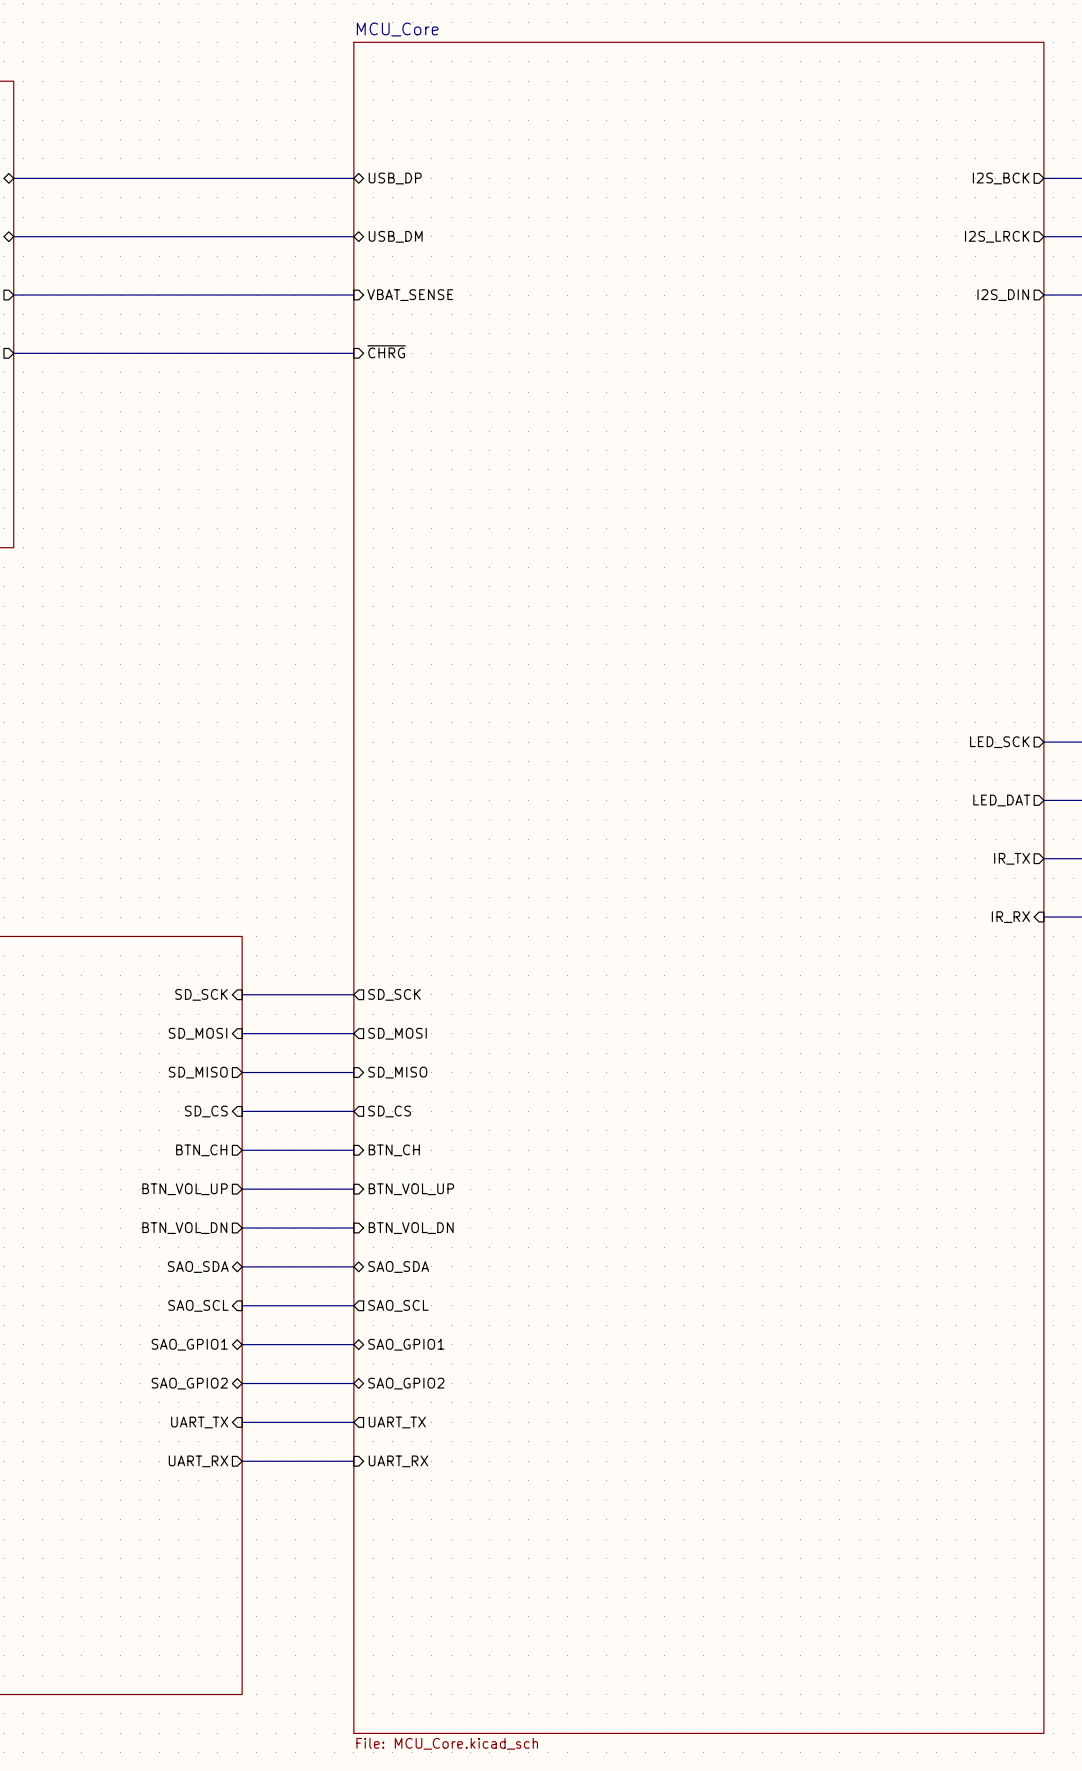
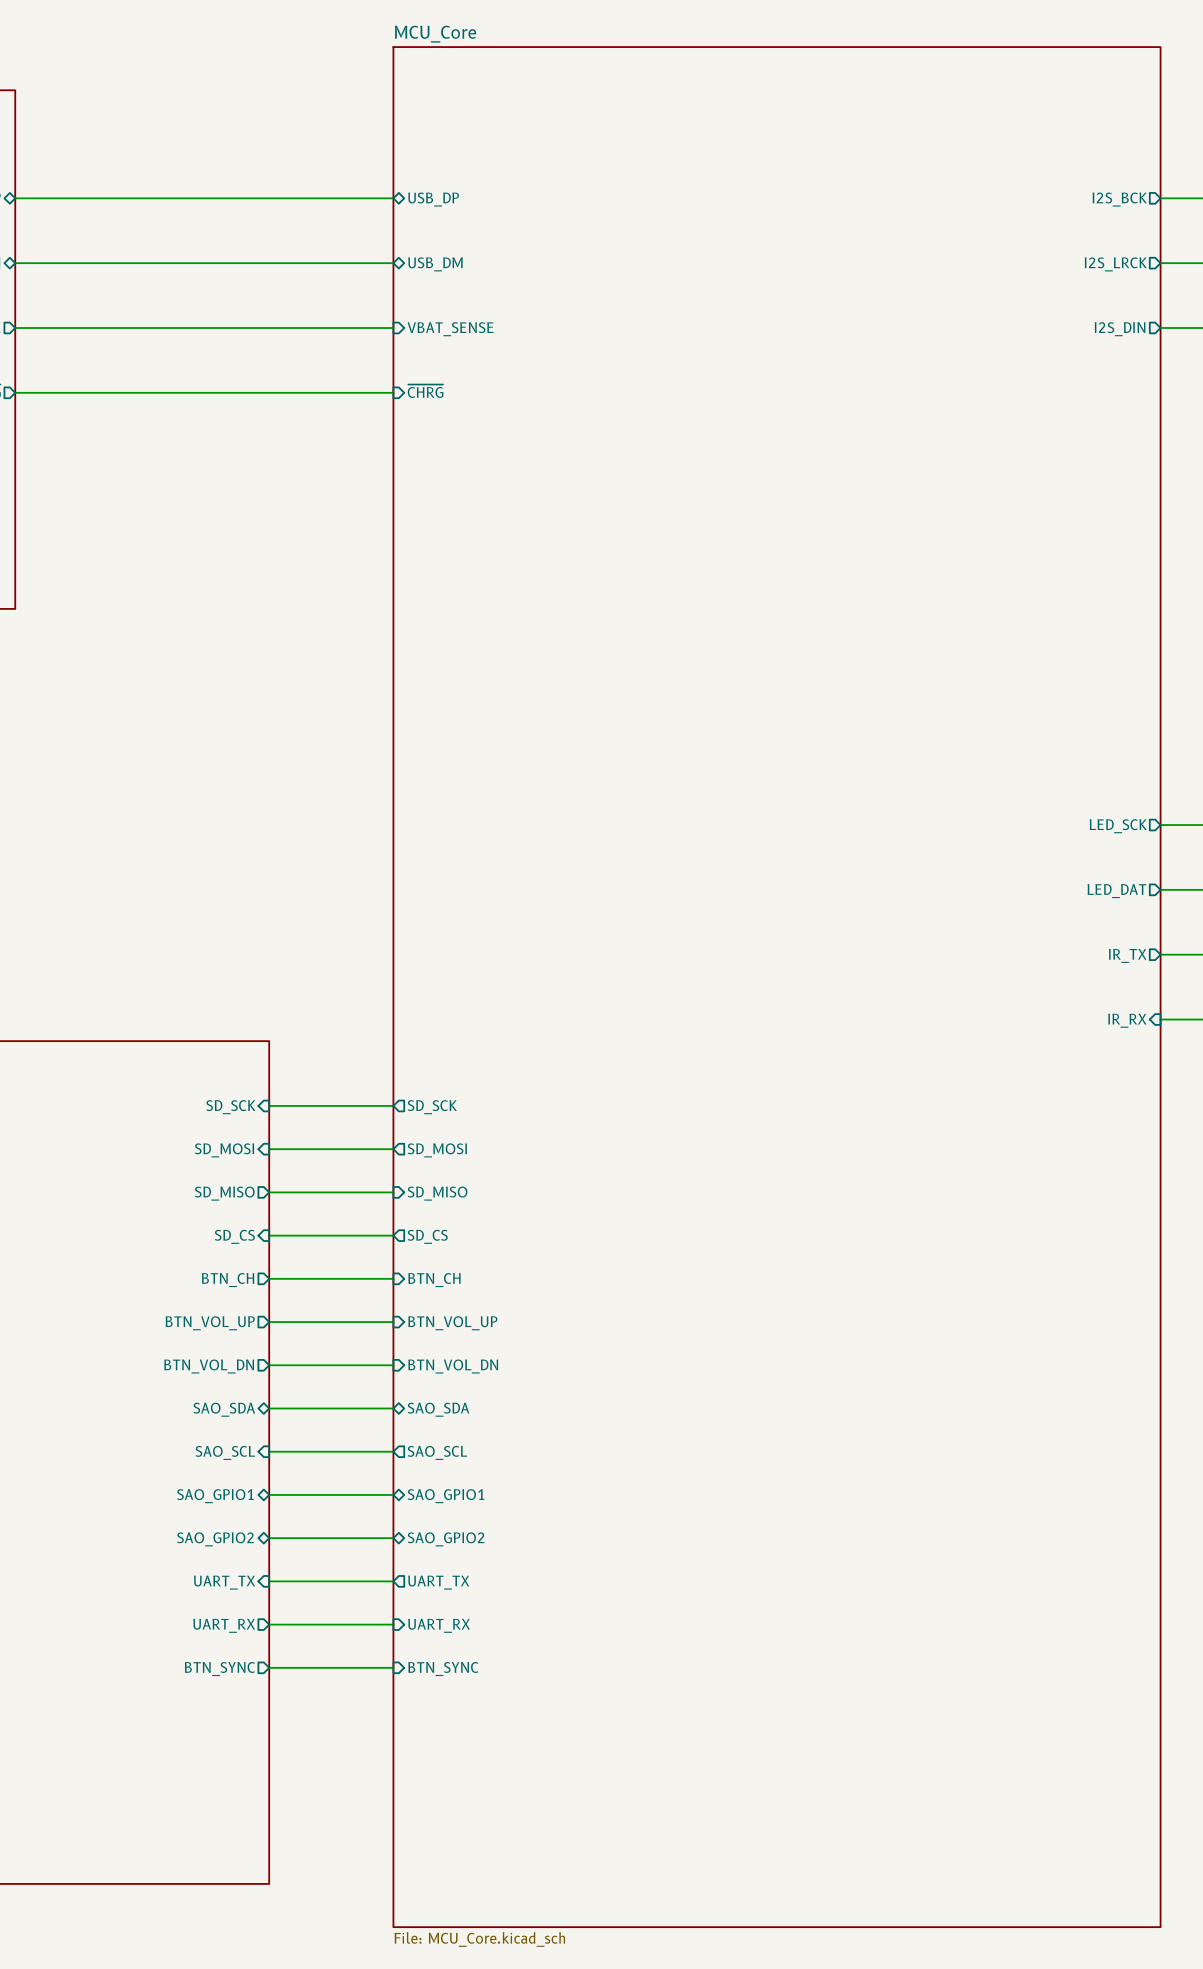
sheet pin: none -> BTN_SYNC (219, 1669)
wire: none -> (269, 1667) (393, 1667)
sheet pin: none -> BTN_SYNC (443, 1669)

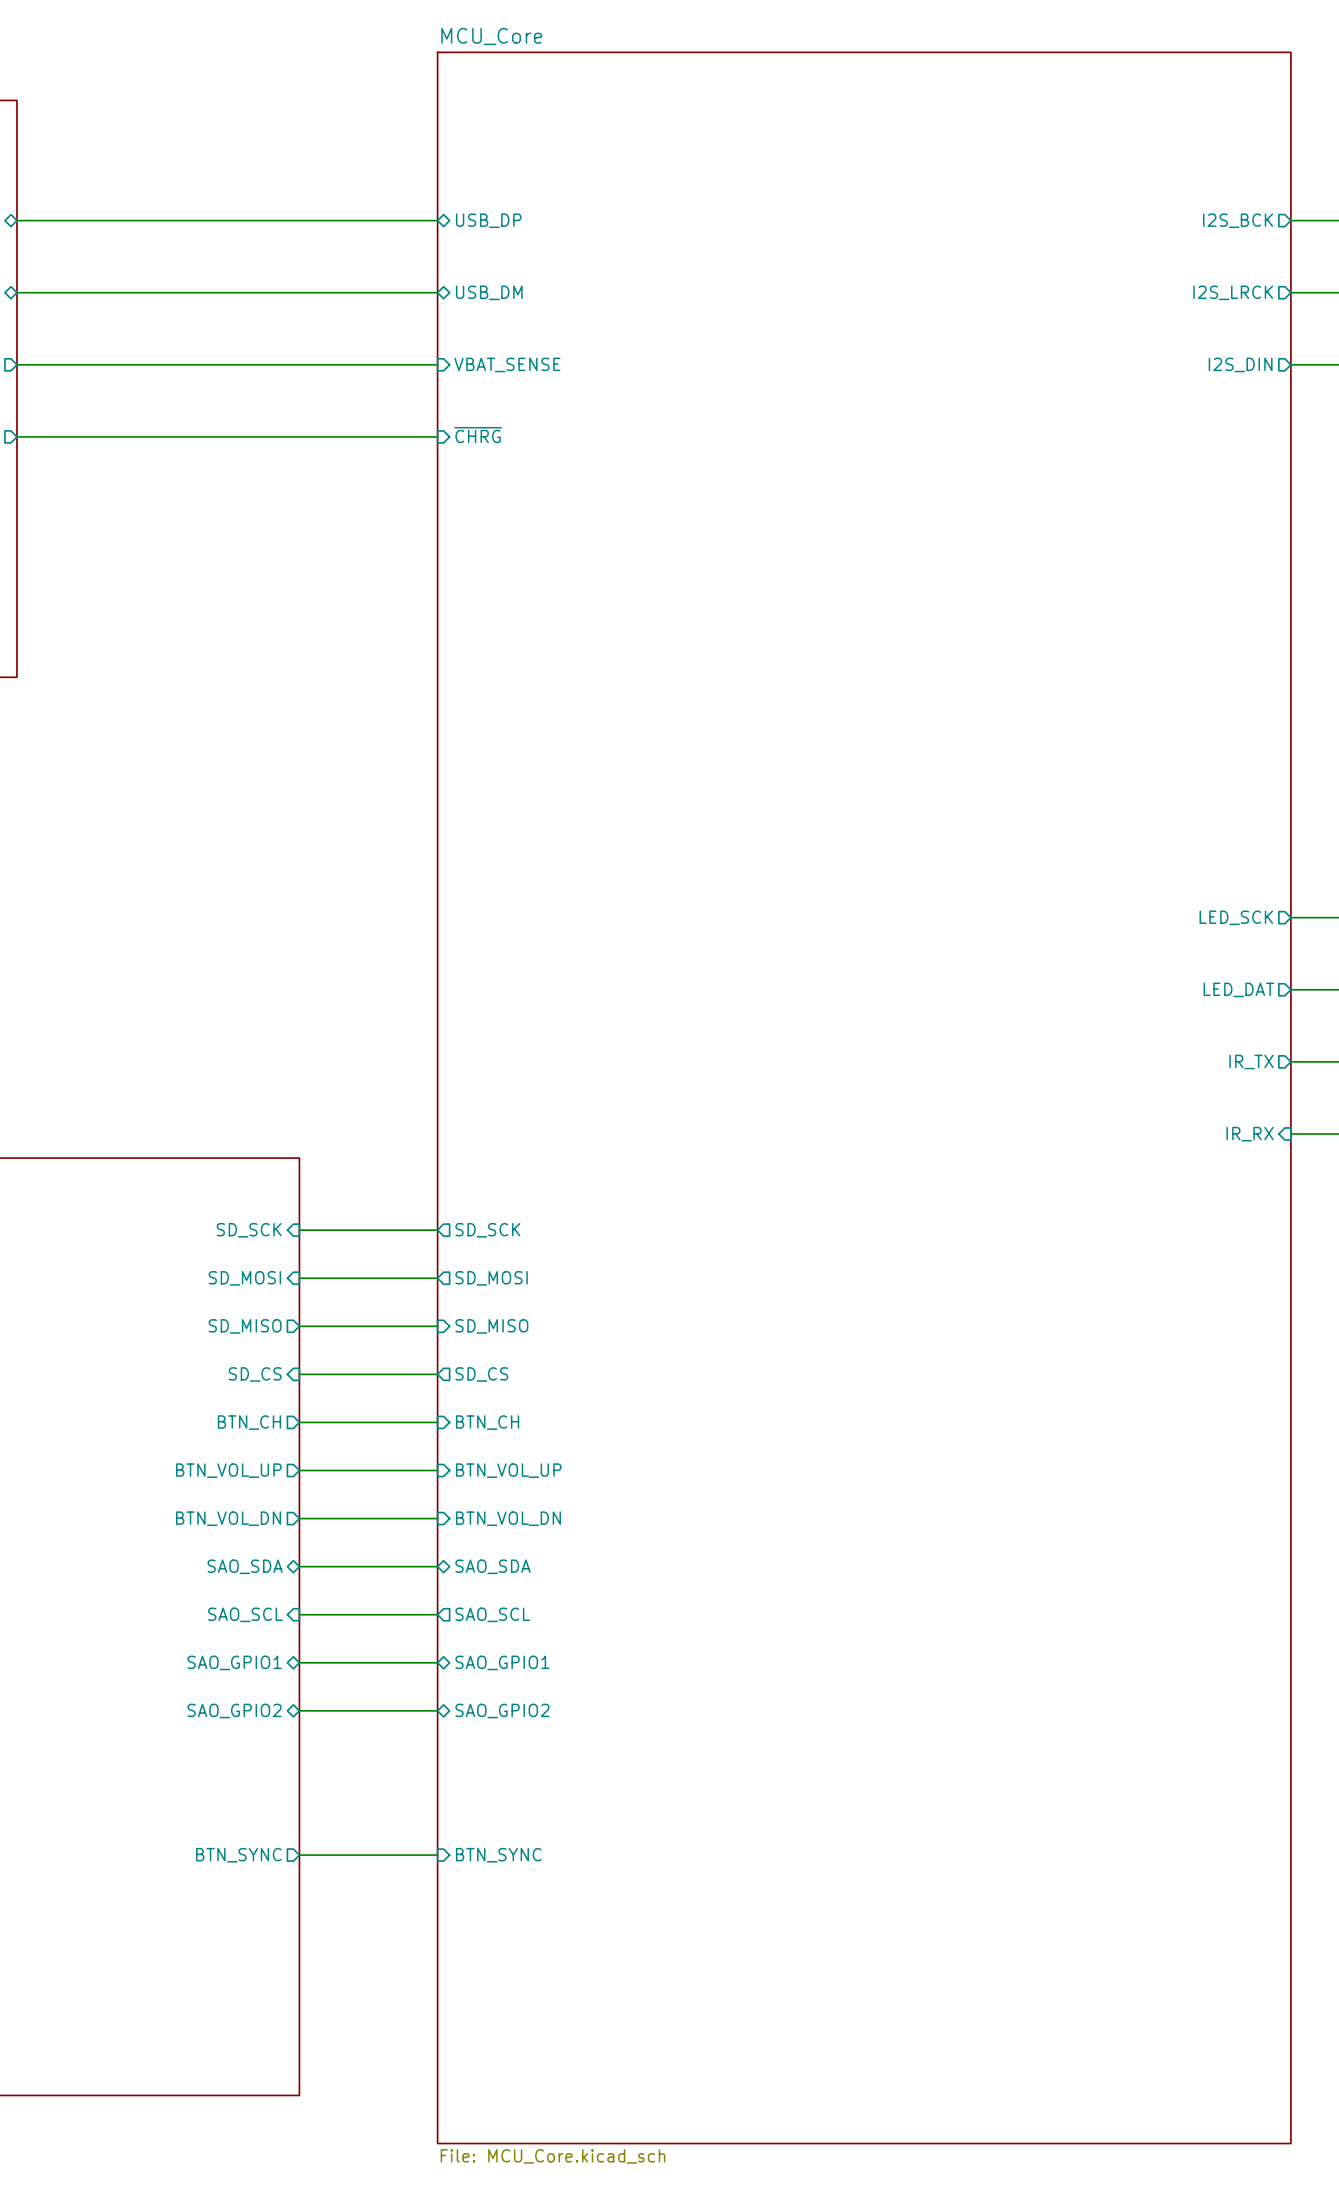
wire: (269, 1581) (393, 1581) -> none
sheet pin: UART_TX (224, 1582) -> none
sheet pin: UART_TX (438, 1582) -> none
wire: (269, 1624) (393, 1624) -> none
sheet pin: UART_RX (224, 1625) -> none
sheet pin: UART_RX (439, 1625) -> none

